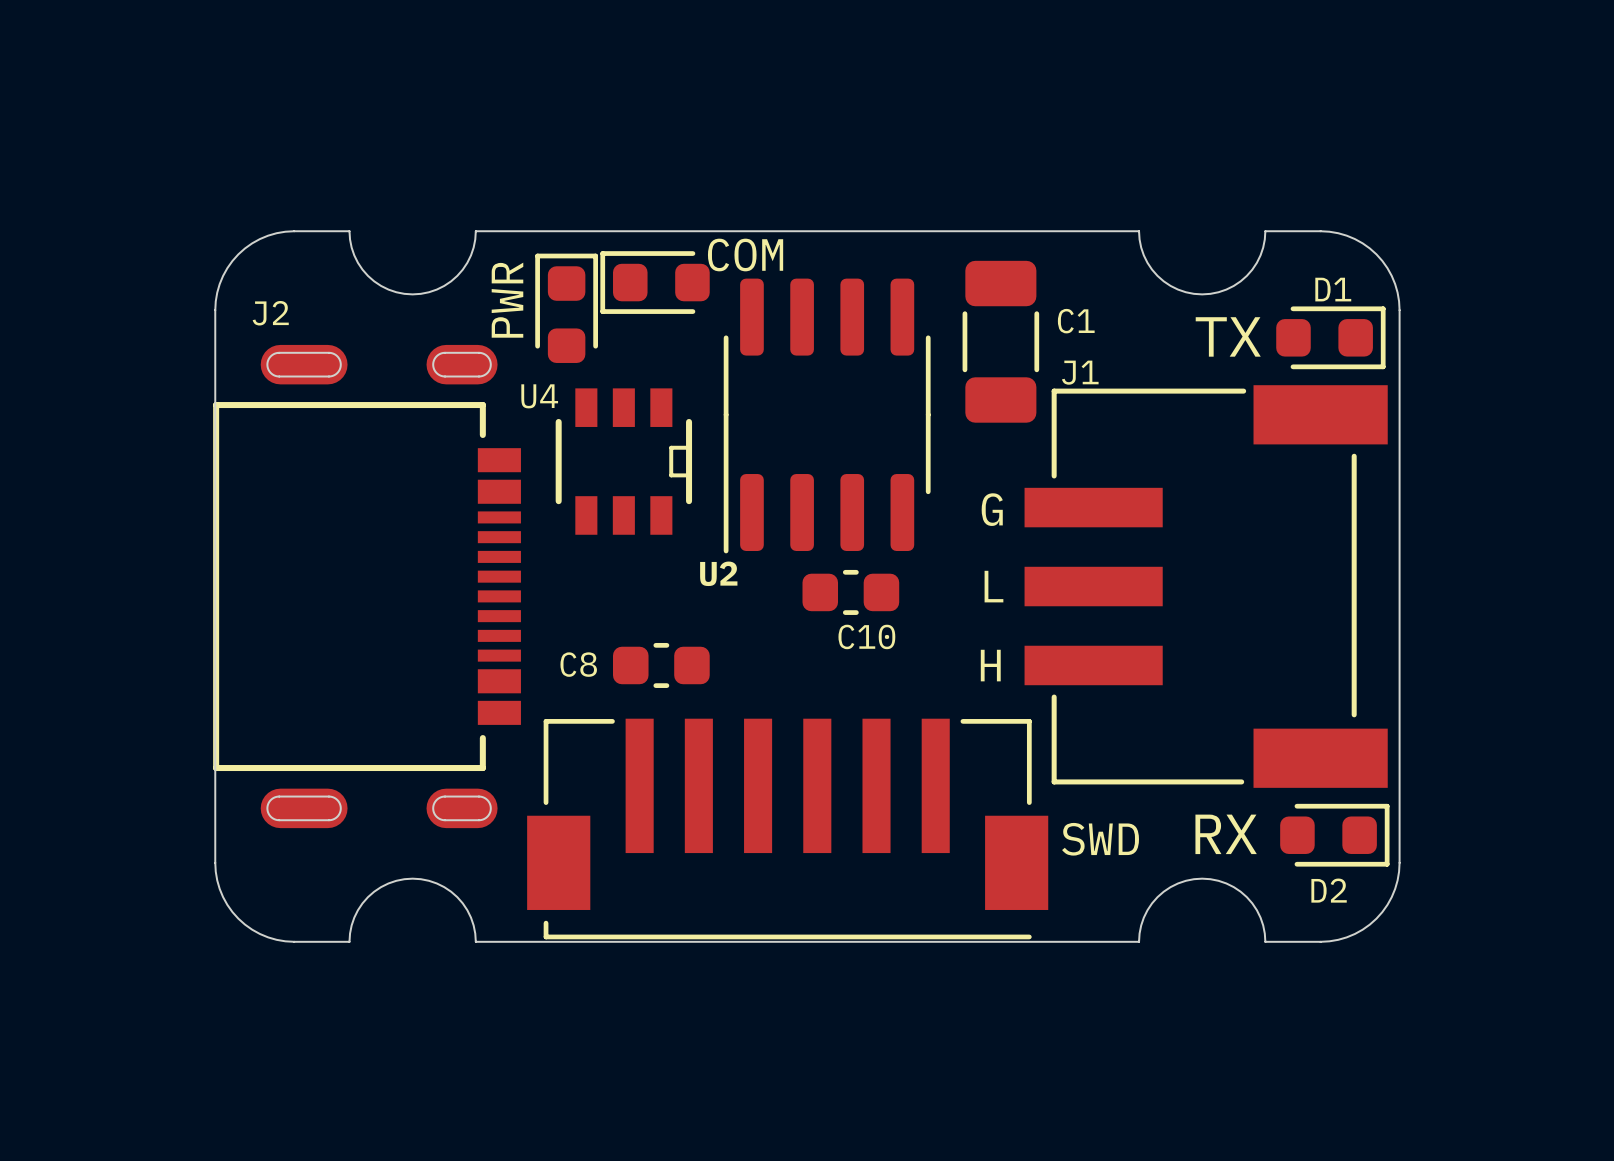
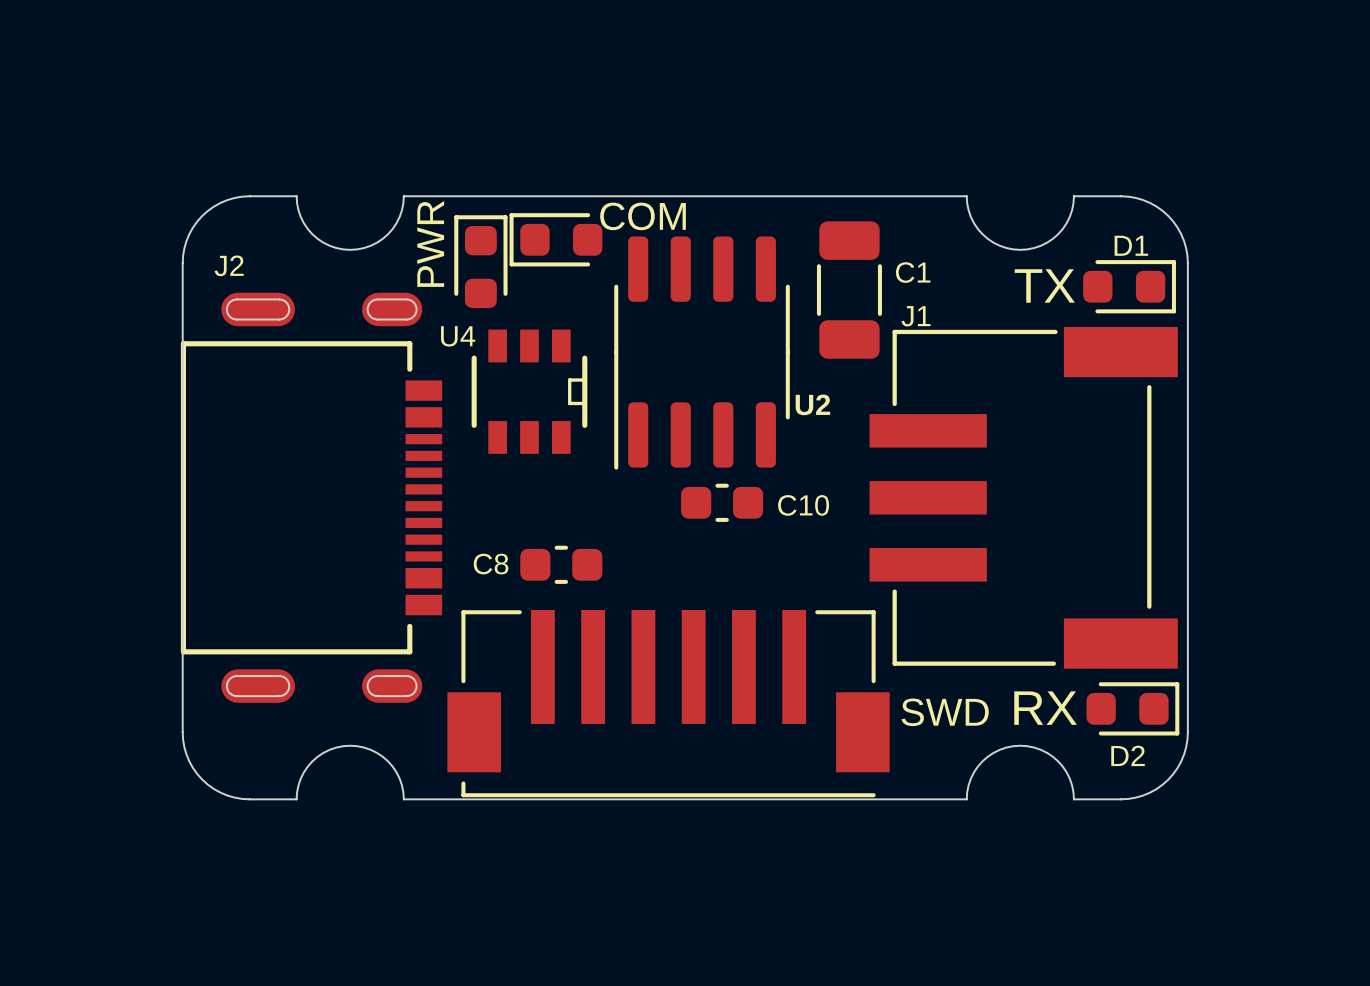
text: G (992, 509) -> none
U2 name position: U2 (718, 573) -> U2 (812, 404)
text: L (993, 586) -> none
C10 name position: C10 (866, 636) -> C10 (803, 505)
text: H (990, 665) -> none

